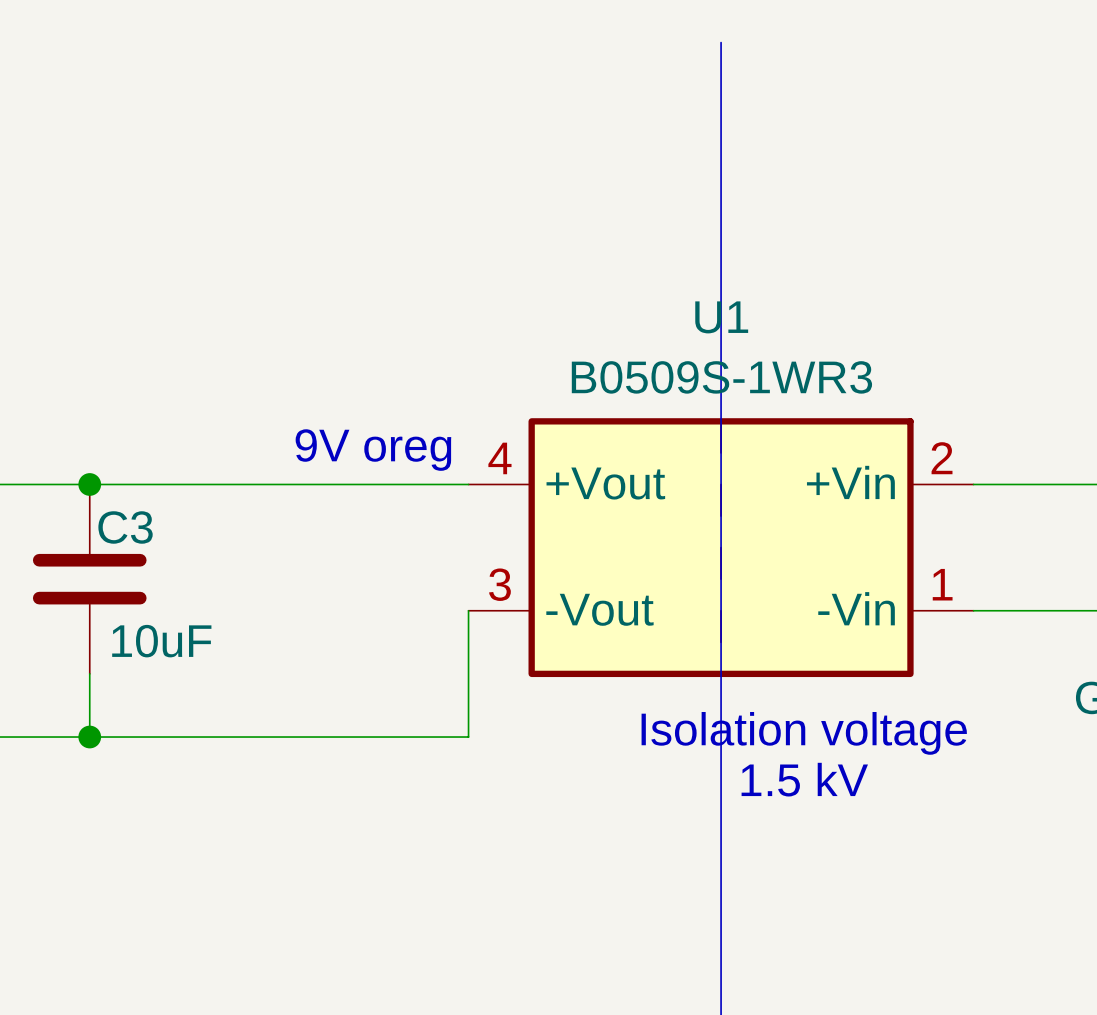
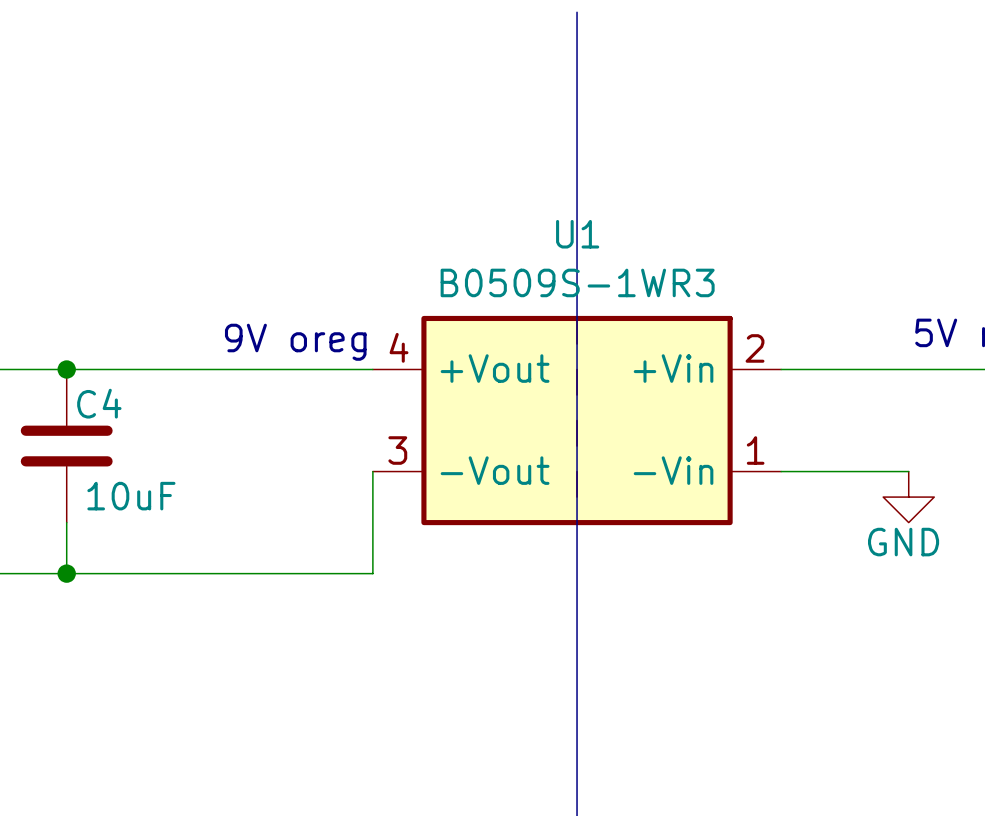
C3 name: C3 (125, 527) -> C4 (99, 403)
text: Isolation voltage (804, 733) -> none
text: 1.5 kV (804, 779) -> none

